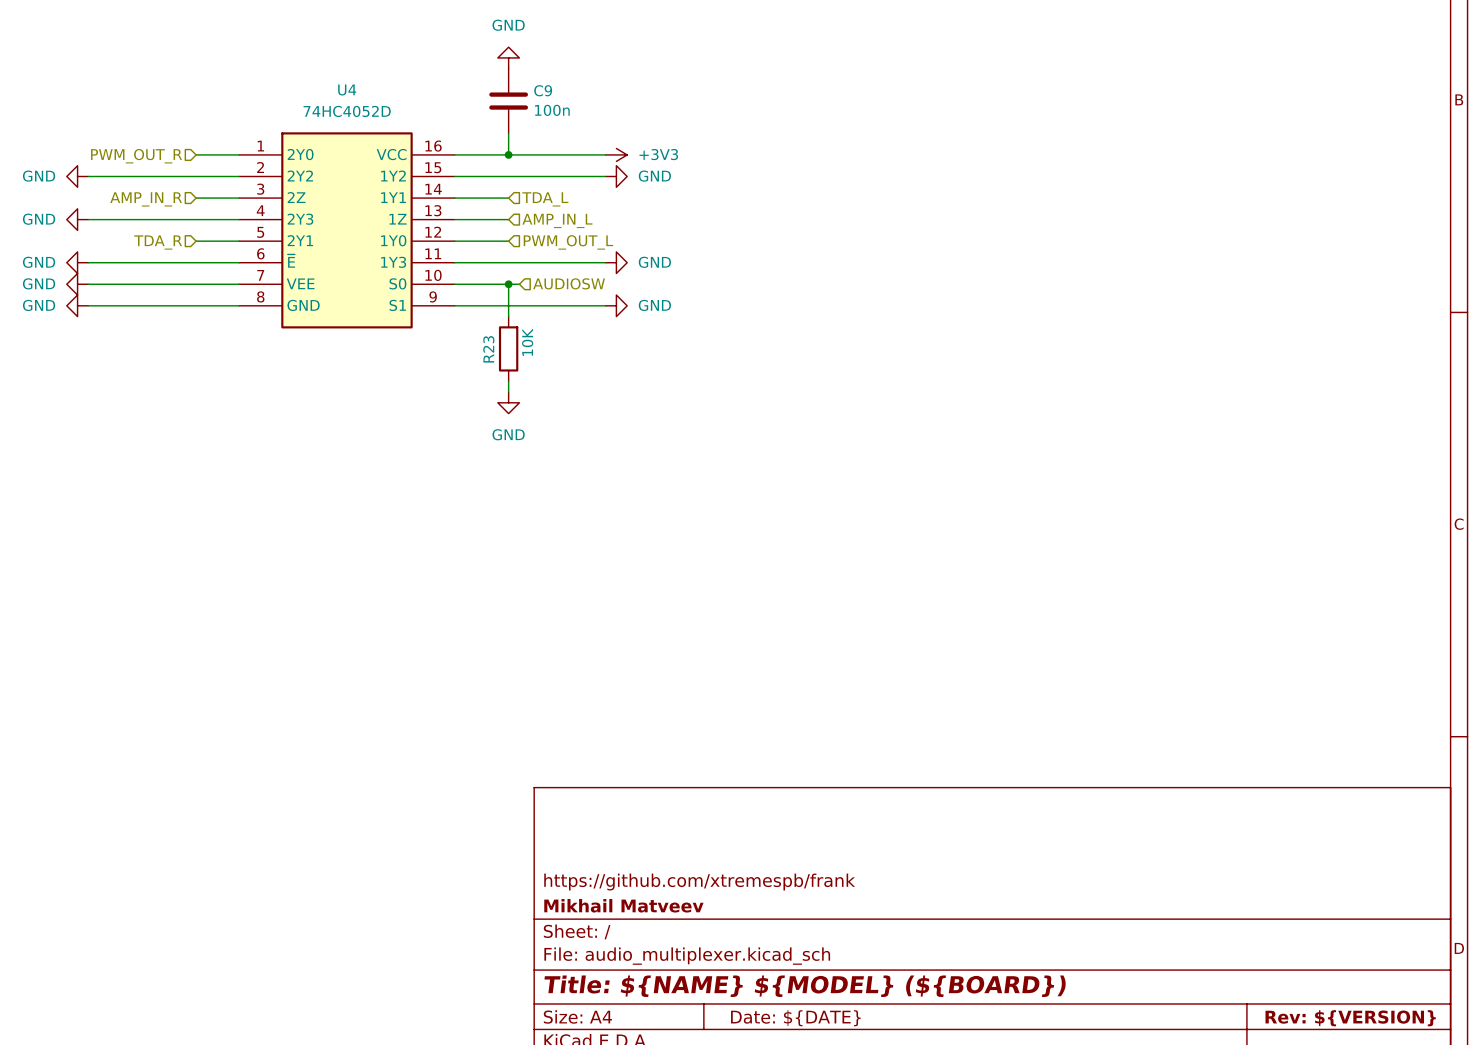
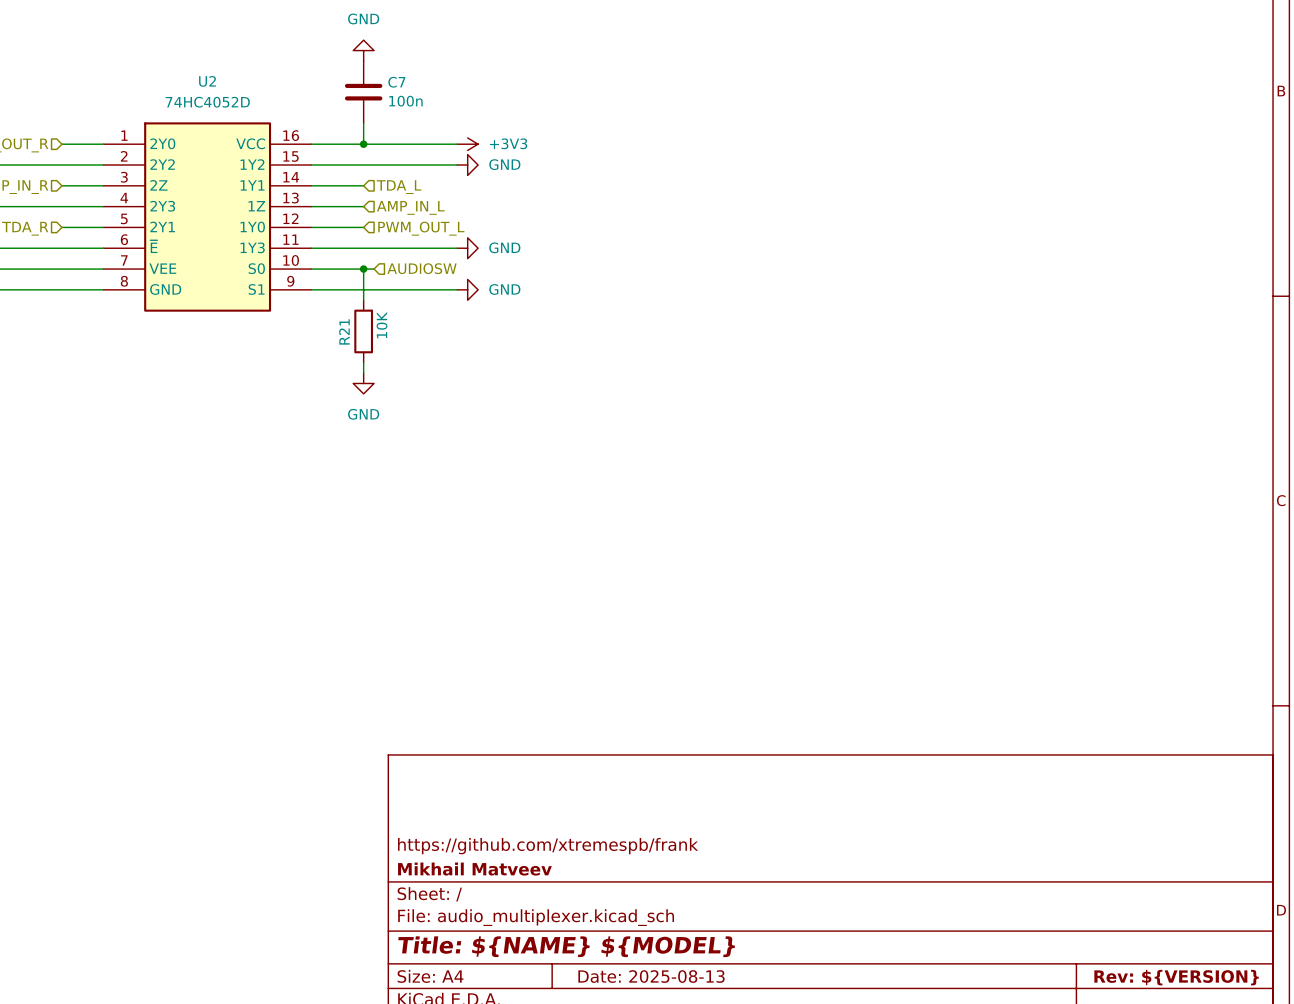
U4 name: U4 (347, 89) -> U2 (207, 81)
C9 name: C9 (543, 90) -> C7 (396, 82)
R23 name: R23 (488, 349) -> R21 (344, 331)
title block: Title: ${NAME} ${MODEL} (${BOARD}) (805, 986) -> Title: ${NAME} ${MODEL} (566, 946)
title block: Date: ${DATE} (795, 1018) -> Date: 2025-08-13 (651, 976)

